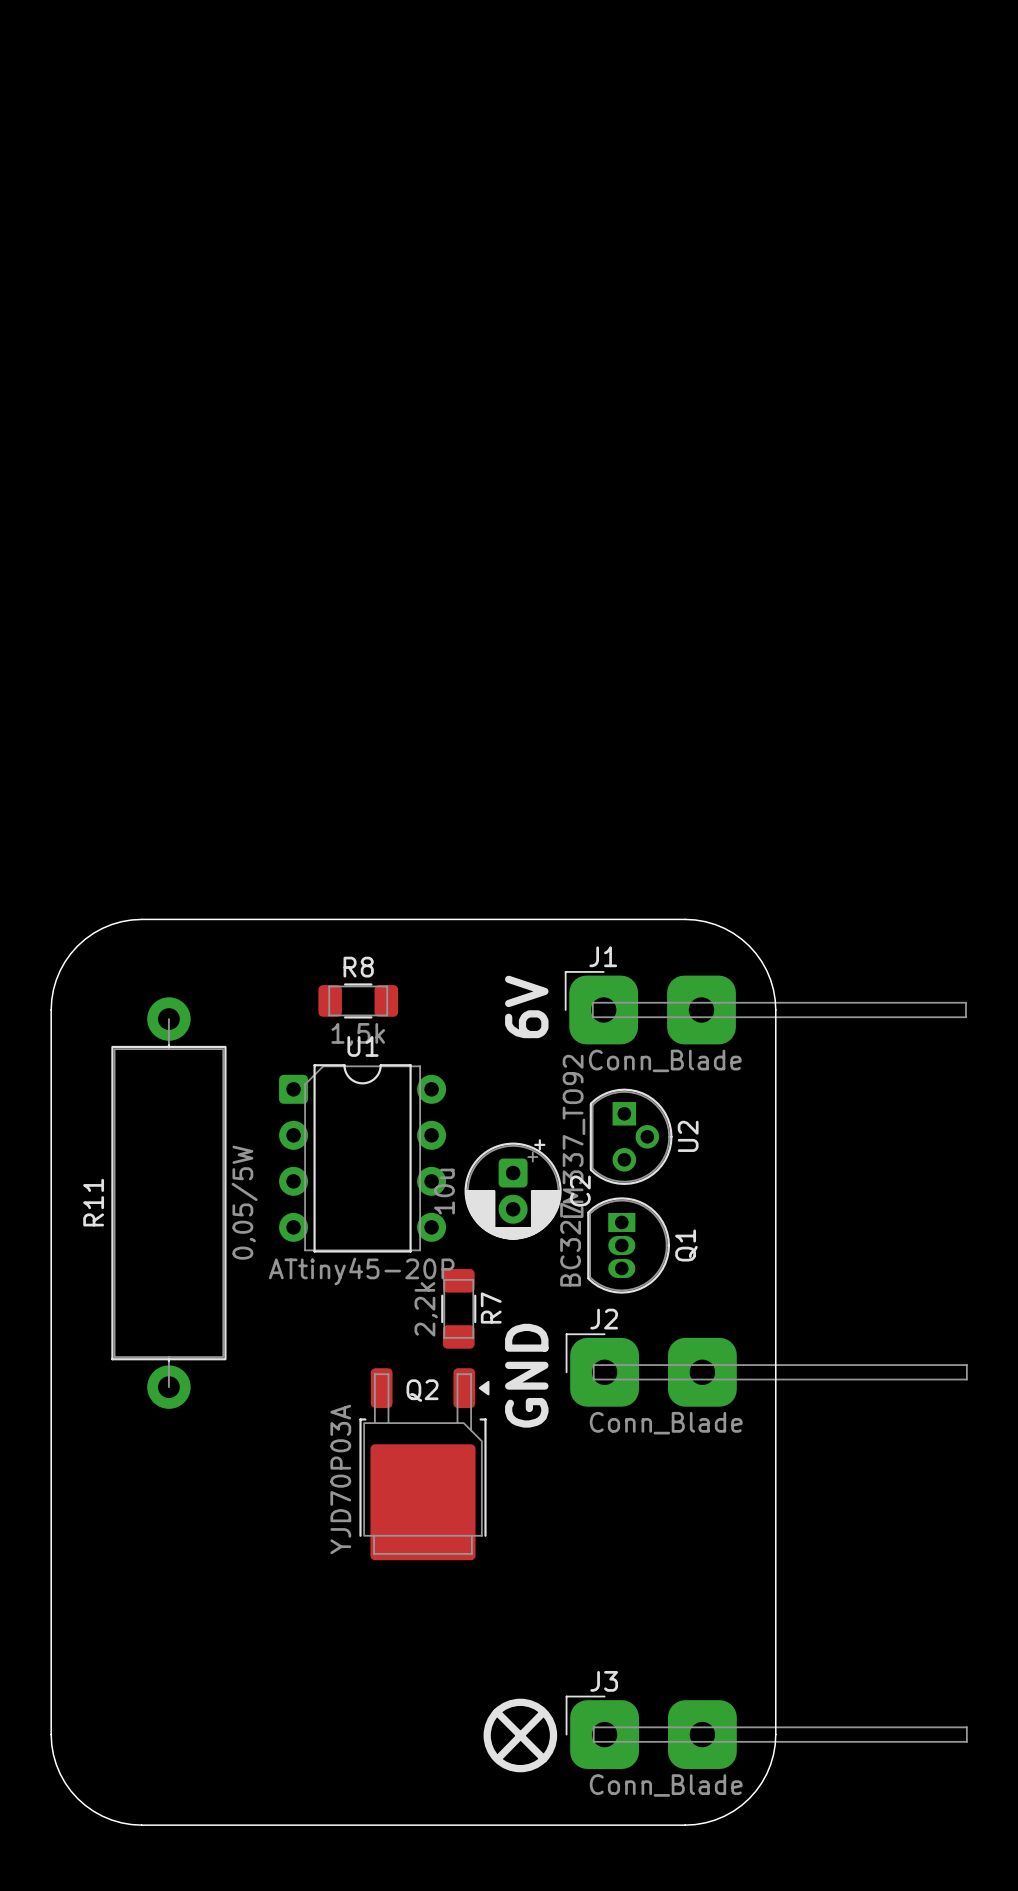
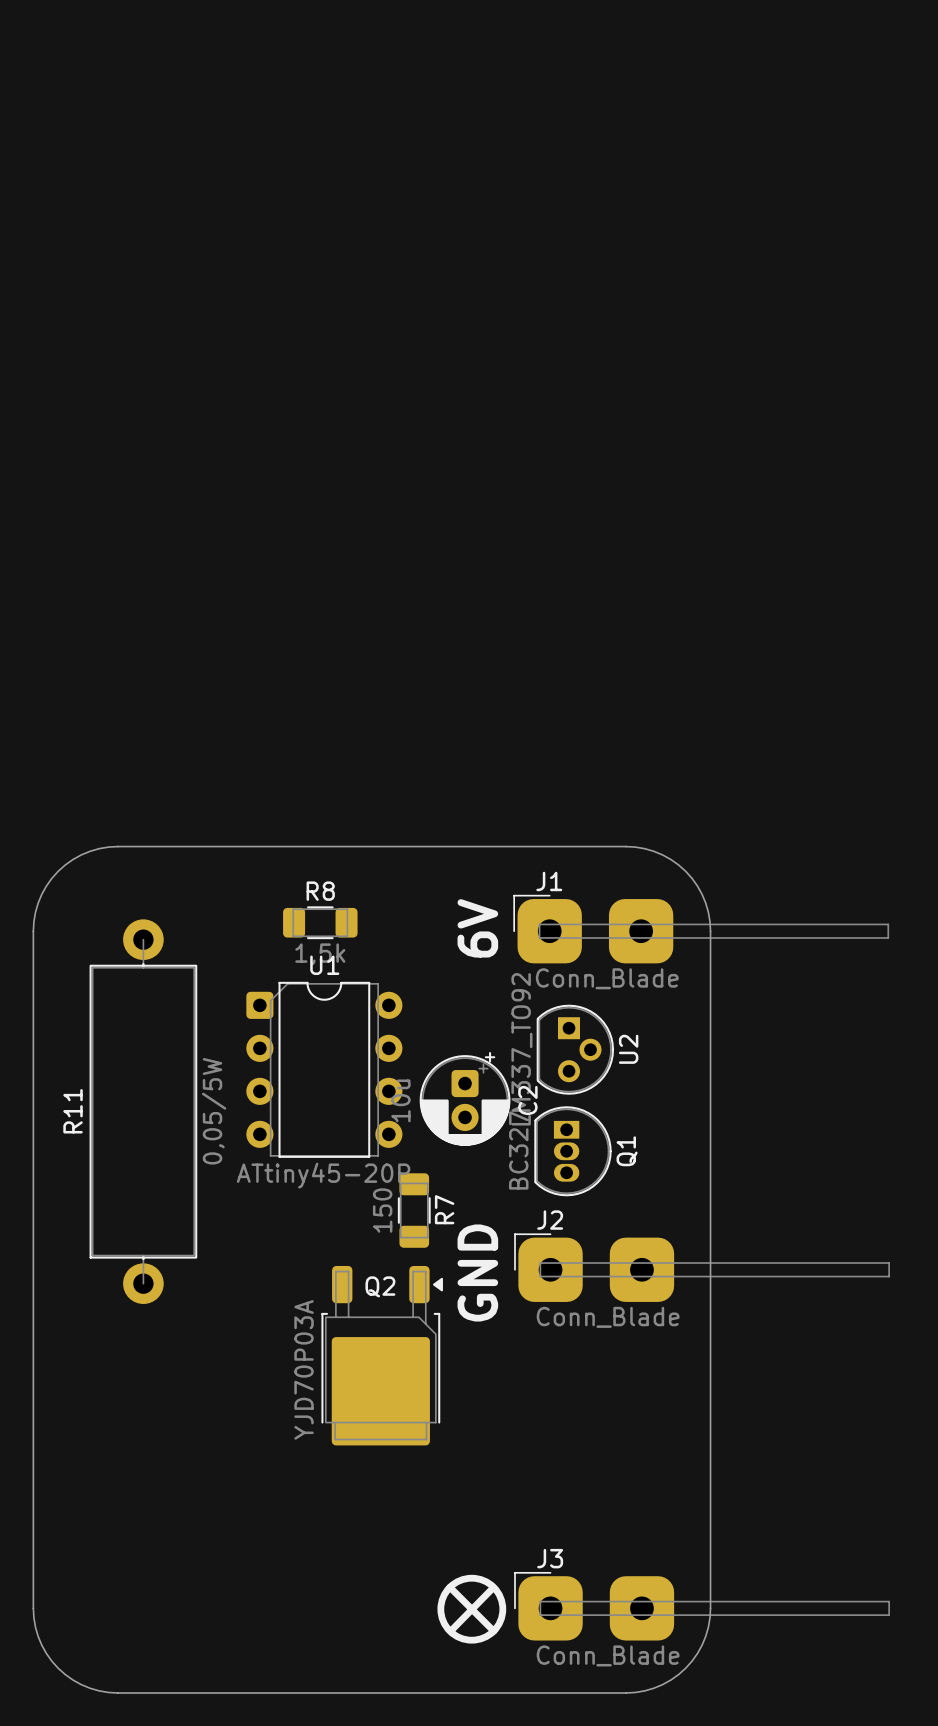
R7 value: 2,2k (426, 1309) -> 150 (382, 1210)

